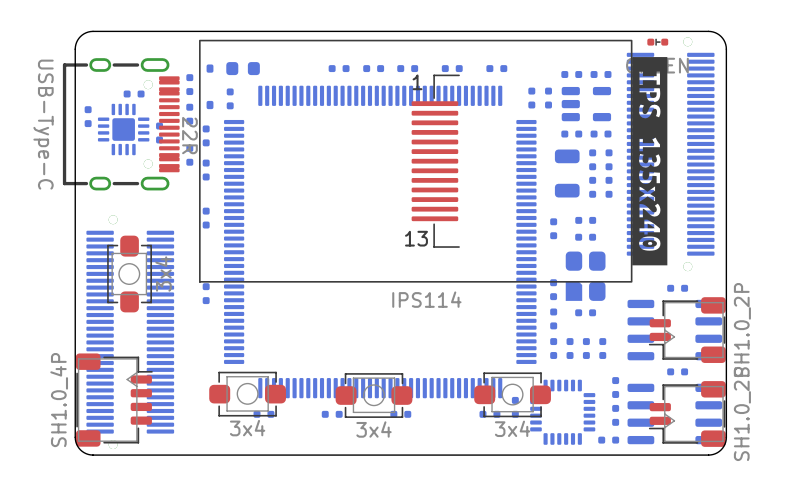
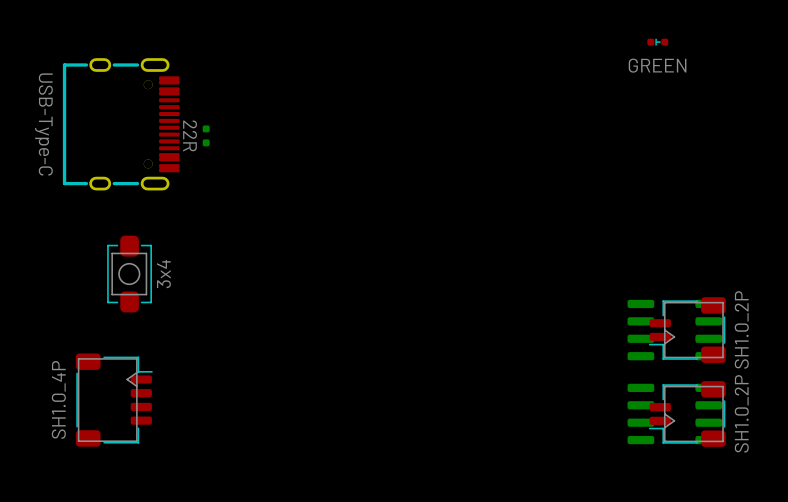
board edge: (93, 31) (708, 31) (717, 33) (723, 40) (726, 49) (726, 437) (723, 446) (717, 452) (708, 455) (93, 455) (84, 452) (77, 446) (75, 437) (75, 49) (80, 36) (93, 31) -> none
drawing: [632, 57, 668, 266] -> none
part: (243, 68) -> none
part: (339, 68) -> none
part: (373, 68) -> none
part: (407, 68) -> none
part: (452, 68) -> none
part: (496, 68) -> none
part: (571, 74) -> none
part: (601, 74) -> none
part: (189, 84) -> none
part: (210, 86) -> none
part: (134, 94) -> none
part: (230, 98) -> none
part: (531, 98) -> none
part: (548, 98) -> none
part: (586, 104) -> none
part: (189, 114) -> none
part: (88, 116) -> none
part: (123, 129) -> none
part: (159, 132) -> none
part: (571, 134) -> none
part: (601, 134) -> none
part: (670, 154) -> none
part: (189, 155) -> none
part: (592, 159) -> none
part: (609, 159) -> none
part: IPS114 (415, 161) -> none
part: (206, 170) -> none
part: (567, 173) -> none
part: (592, 187) -> none
part: (609, 187) -> none
part: (206, 218) -> none
part: (585, 220) -> none
part: (553, 228) -> none
part: (585, 237) -> none
part: (380, 241) -> none
part: (585, 276) -> none
part: (677, 288) -> none
part: (553, 289) -> none
part: (206, 293) -> none
part: (585, 312) -> none
part: (553, 318) -> none
part: (130, 332) -> none
part: (553, 348) -> none
part: (570, 348) -> none
part: (586, 348) -> none
part: (602, 348) -> none
part: (677, 371) -> none
part: (615, 387) -> none
part: 3x4 (247, 394) -> none
part: 3x4 (512, 394) -> none
part: 3x4 (374, 395) -> none
part: (515, 407) -> none
part: (562, 412) -> none
part: (263, 414) -> none
part: (332, 414) -> none
part: (400, 414) -> none
part: (489, 414) -> none
part: (615, 415) -> none
part: (608, 440) -> none

